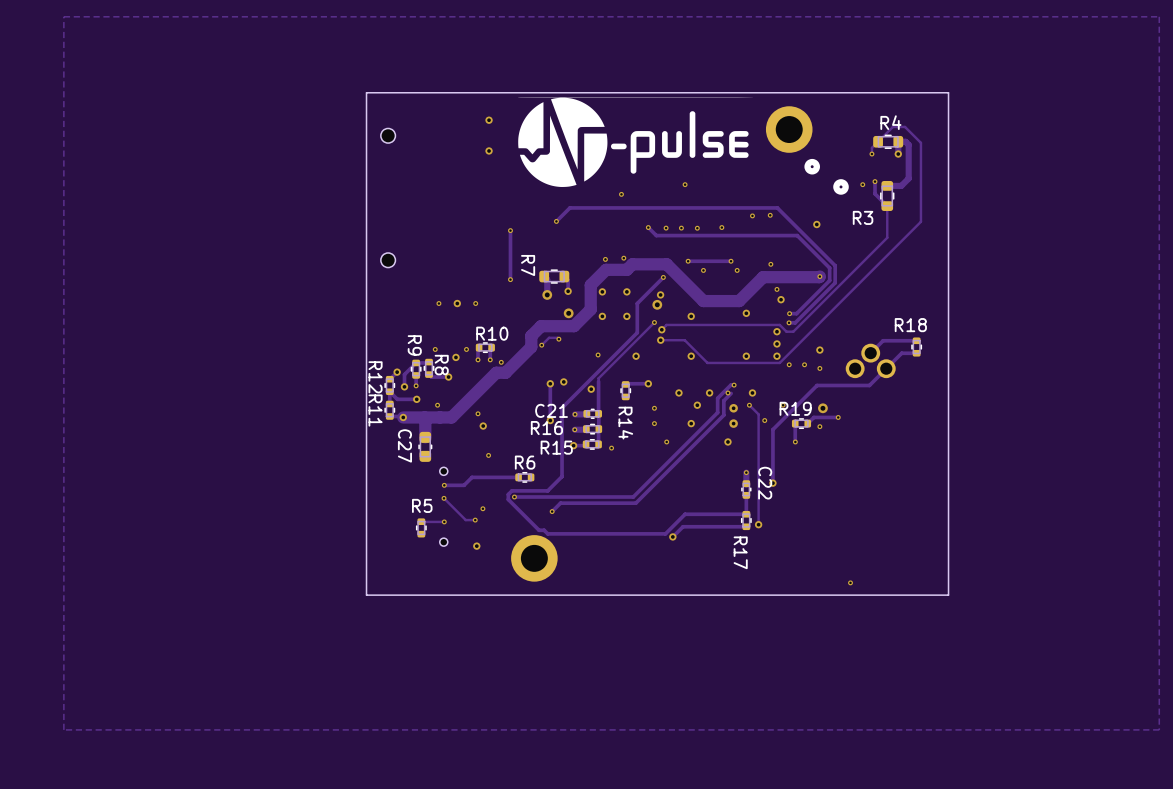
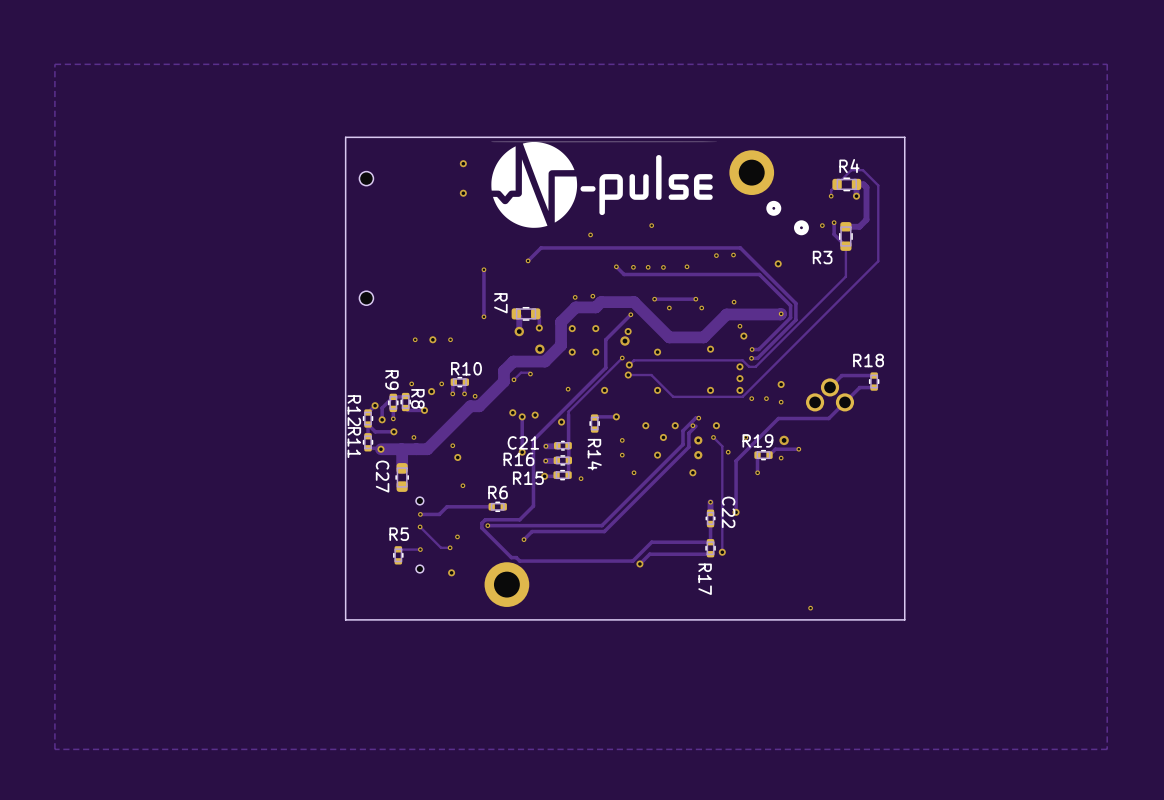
via: none -> (512, 412)

